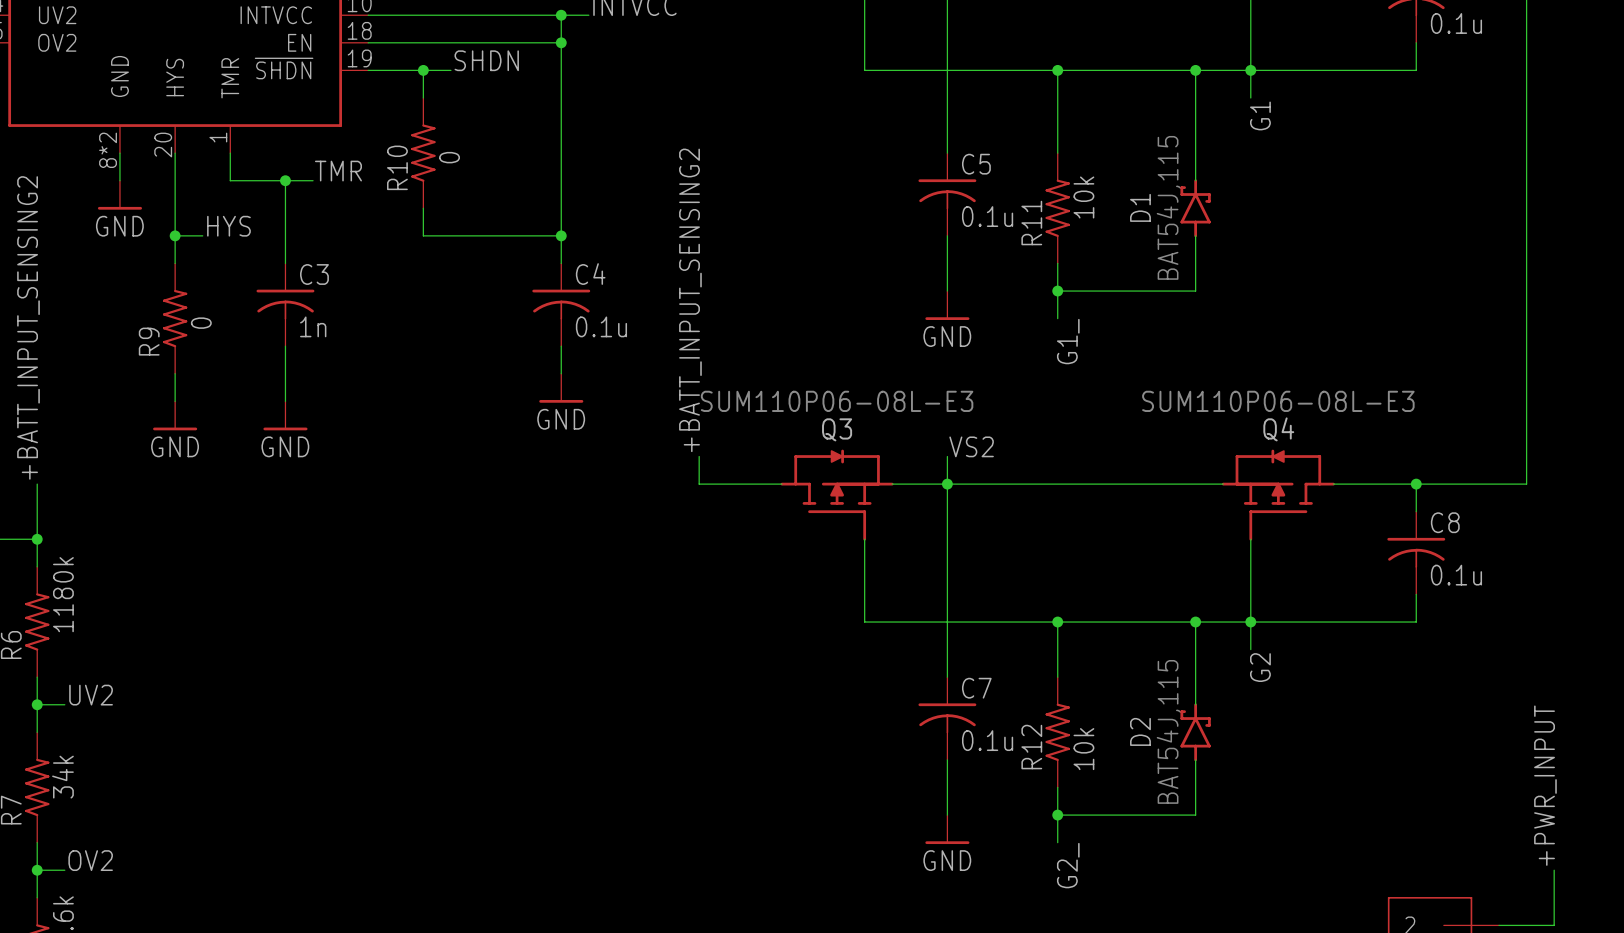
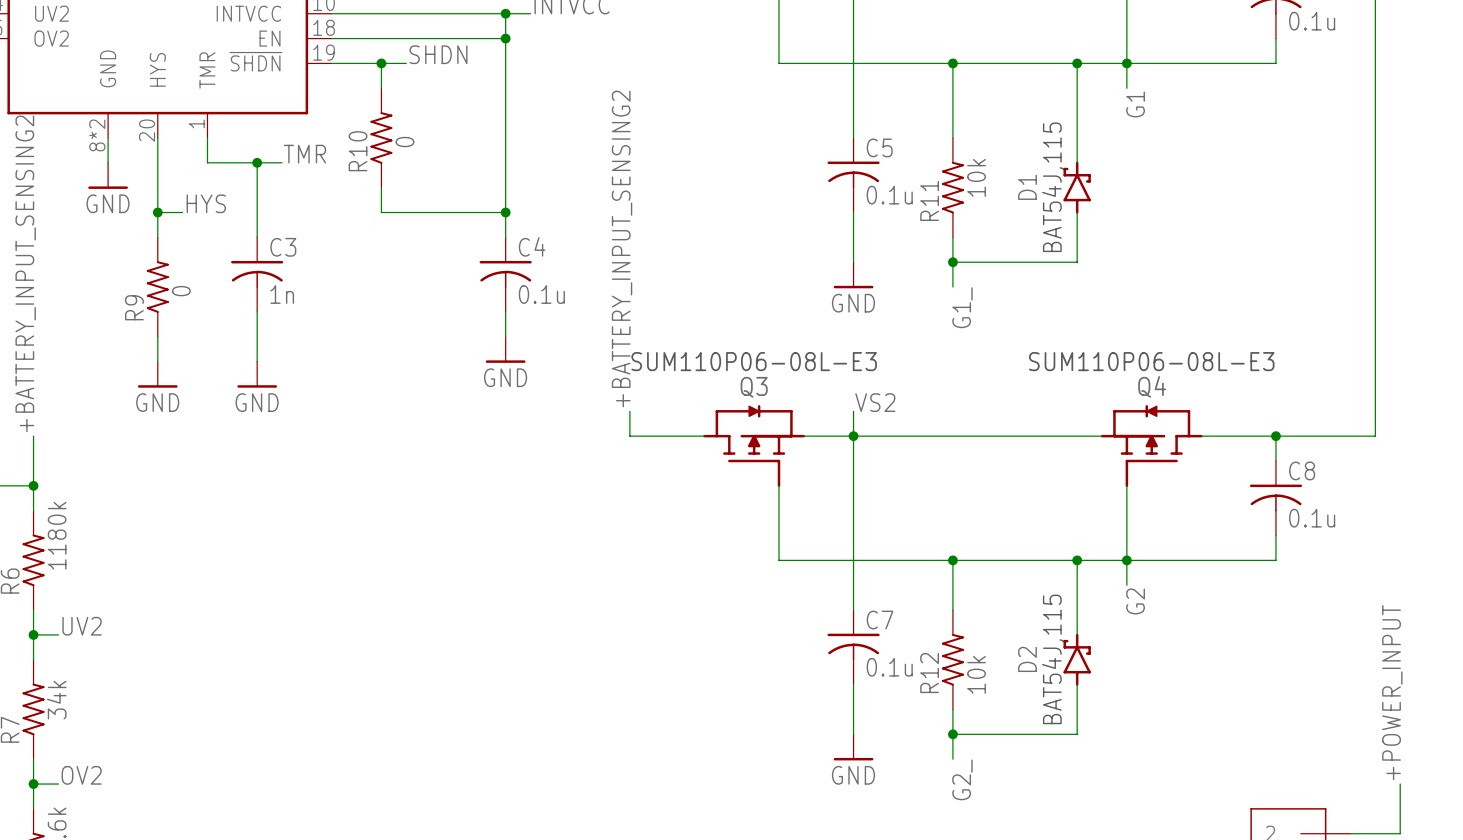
label: +BATT_INPUT_SENSING2 (690, 300) -> +BATTERY_INPUT_SENSING2 (622, 248)
label: +BATT_INPUT_SENSING2 (28, 327) -> +BATTERY_INPUT_SENSING2 (25, 273)
label: +PWR_INPUT (1545, 785) -> +POWER_INPUT (1392, 692)

